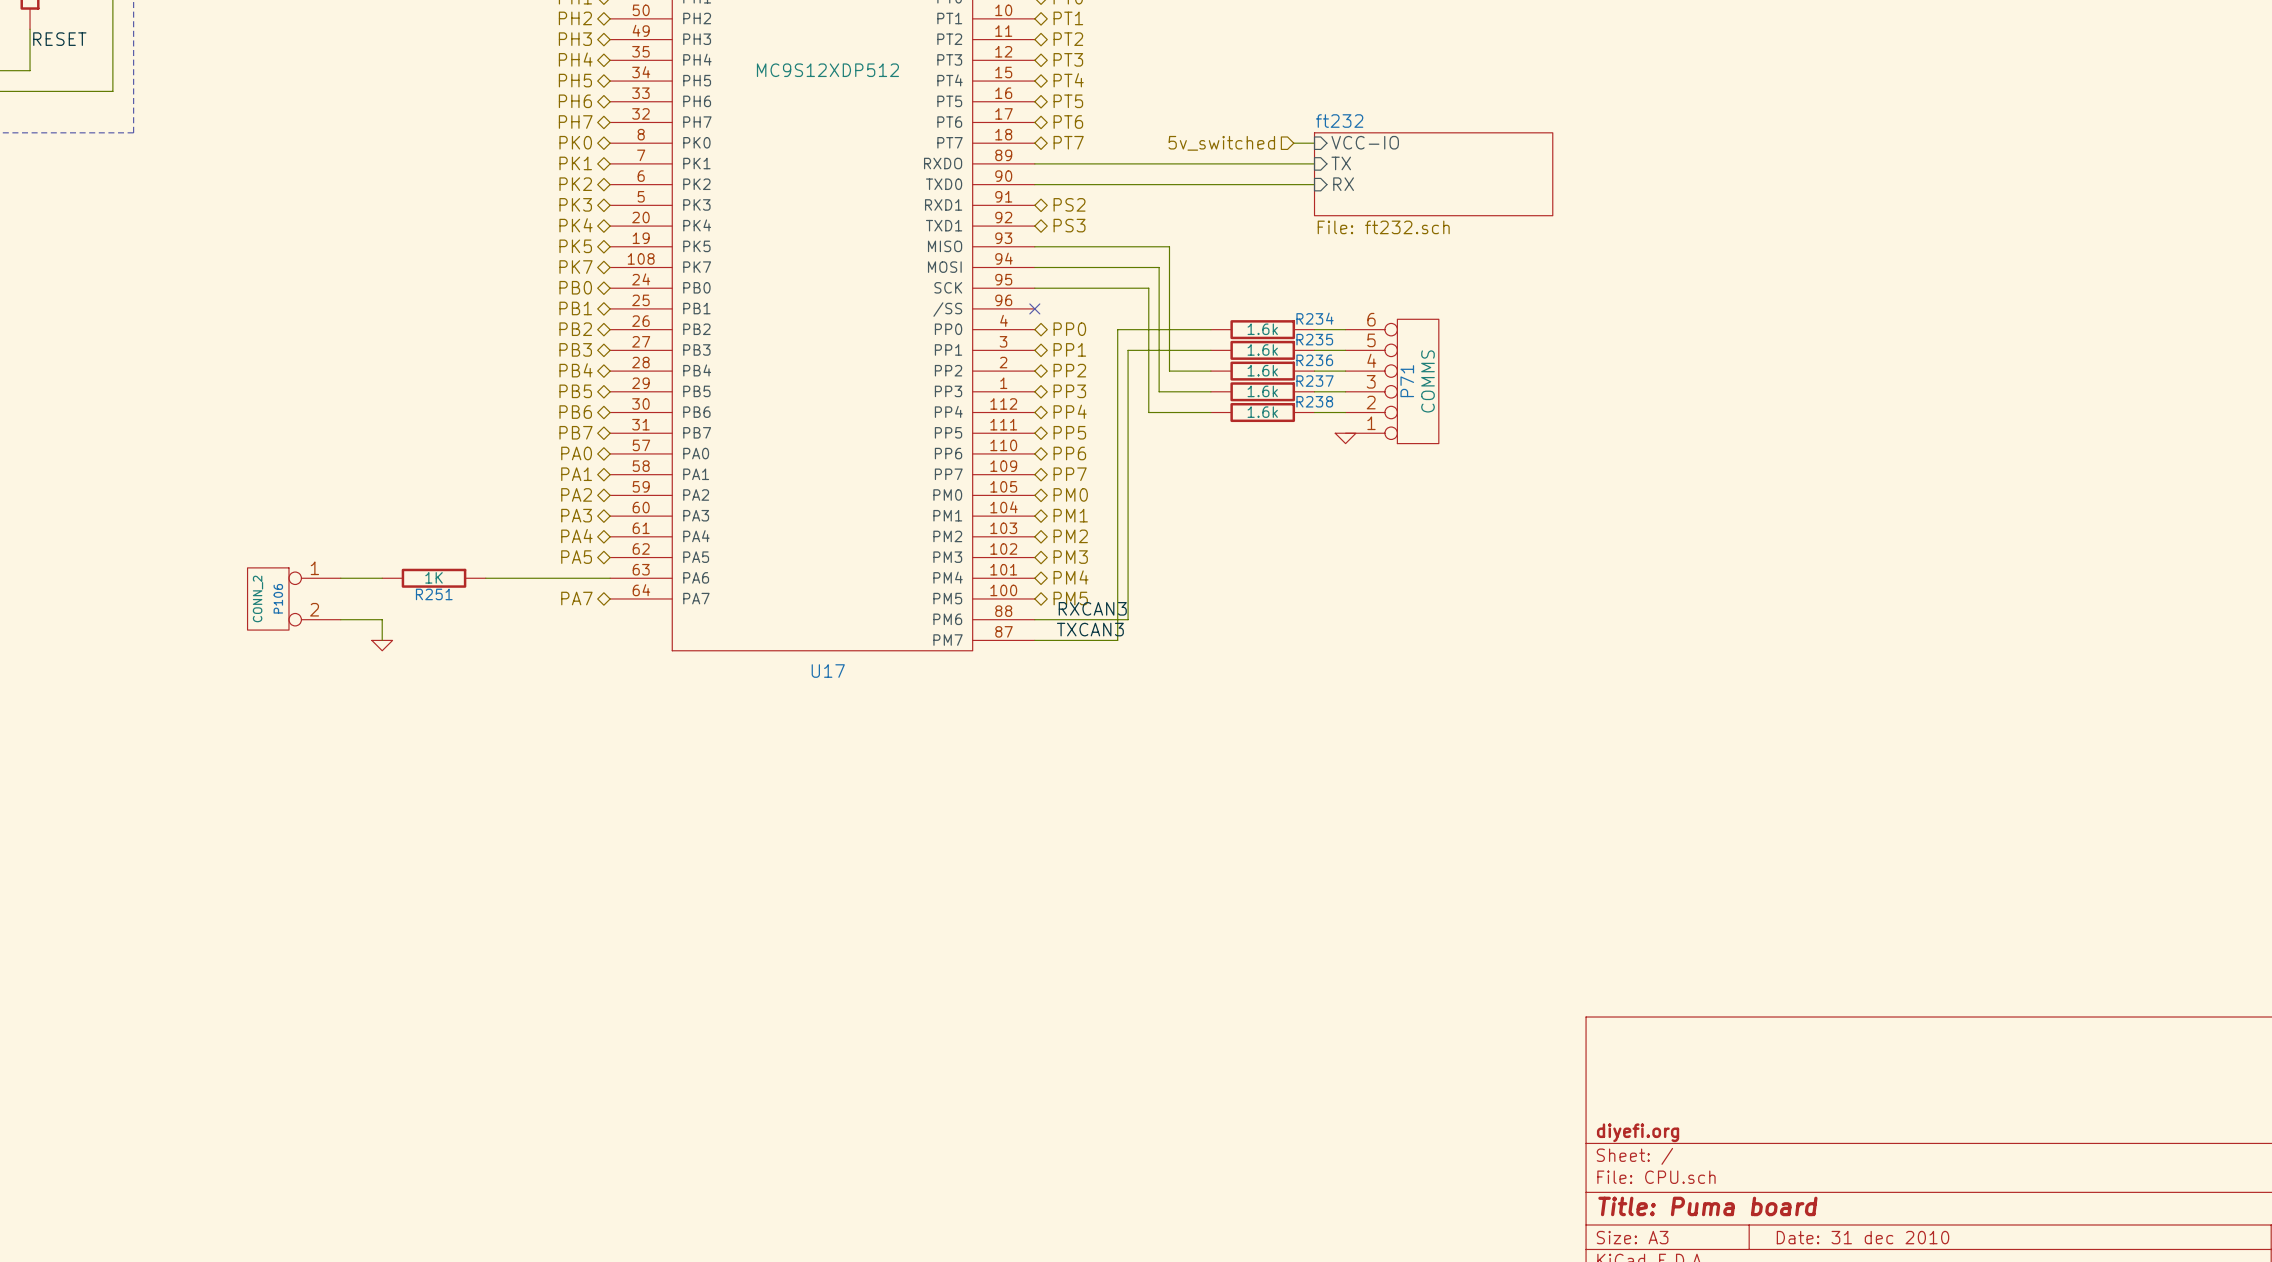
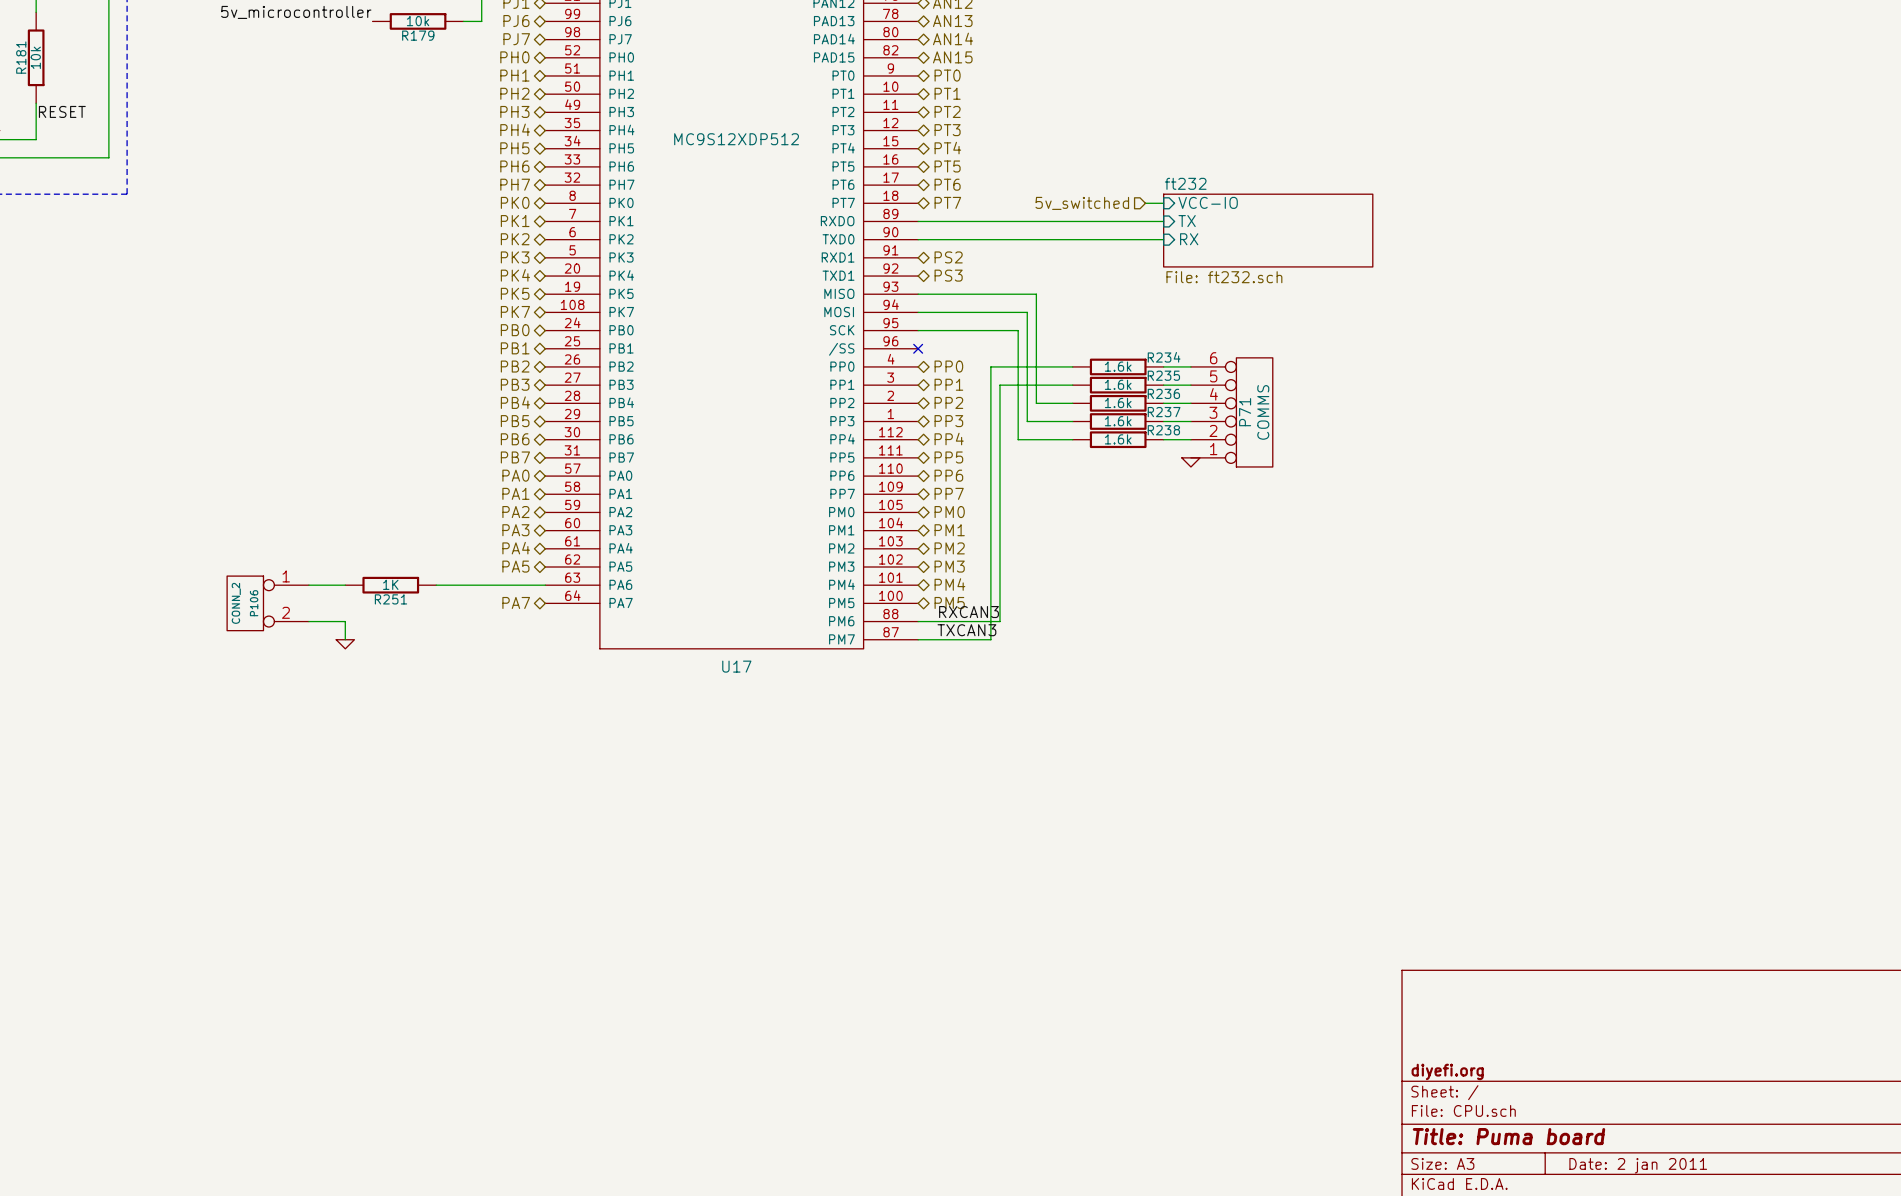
title block: Date: 31 dec 2010 (1863, 1237) -> Date: 2 jan 2011 (1638, 1165)

